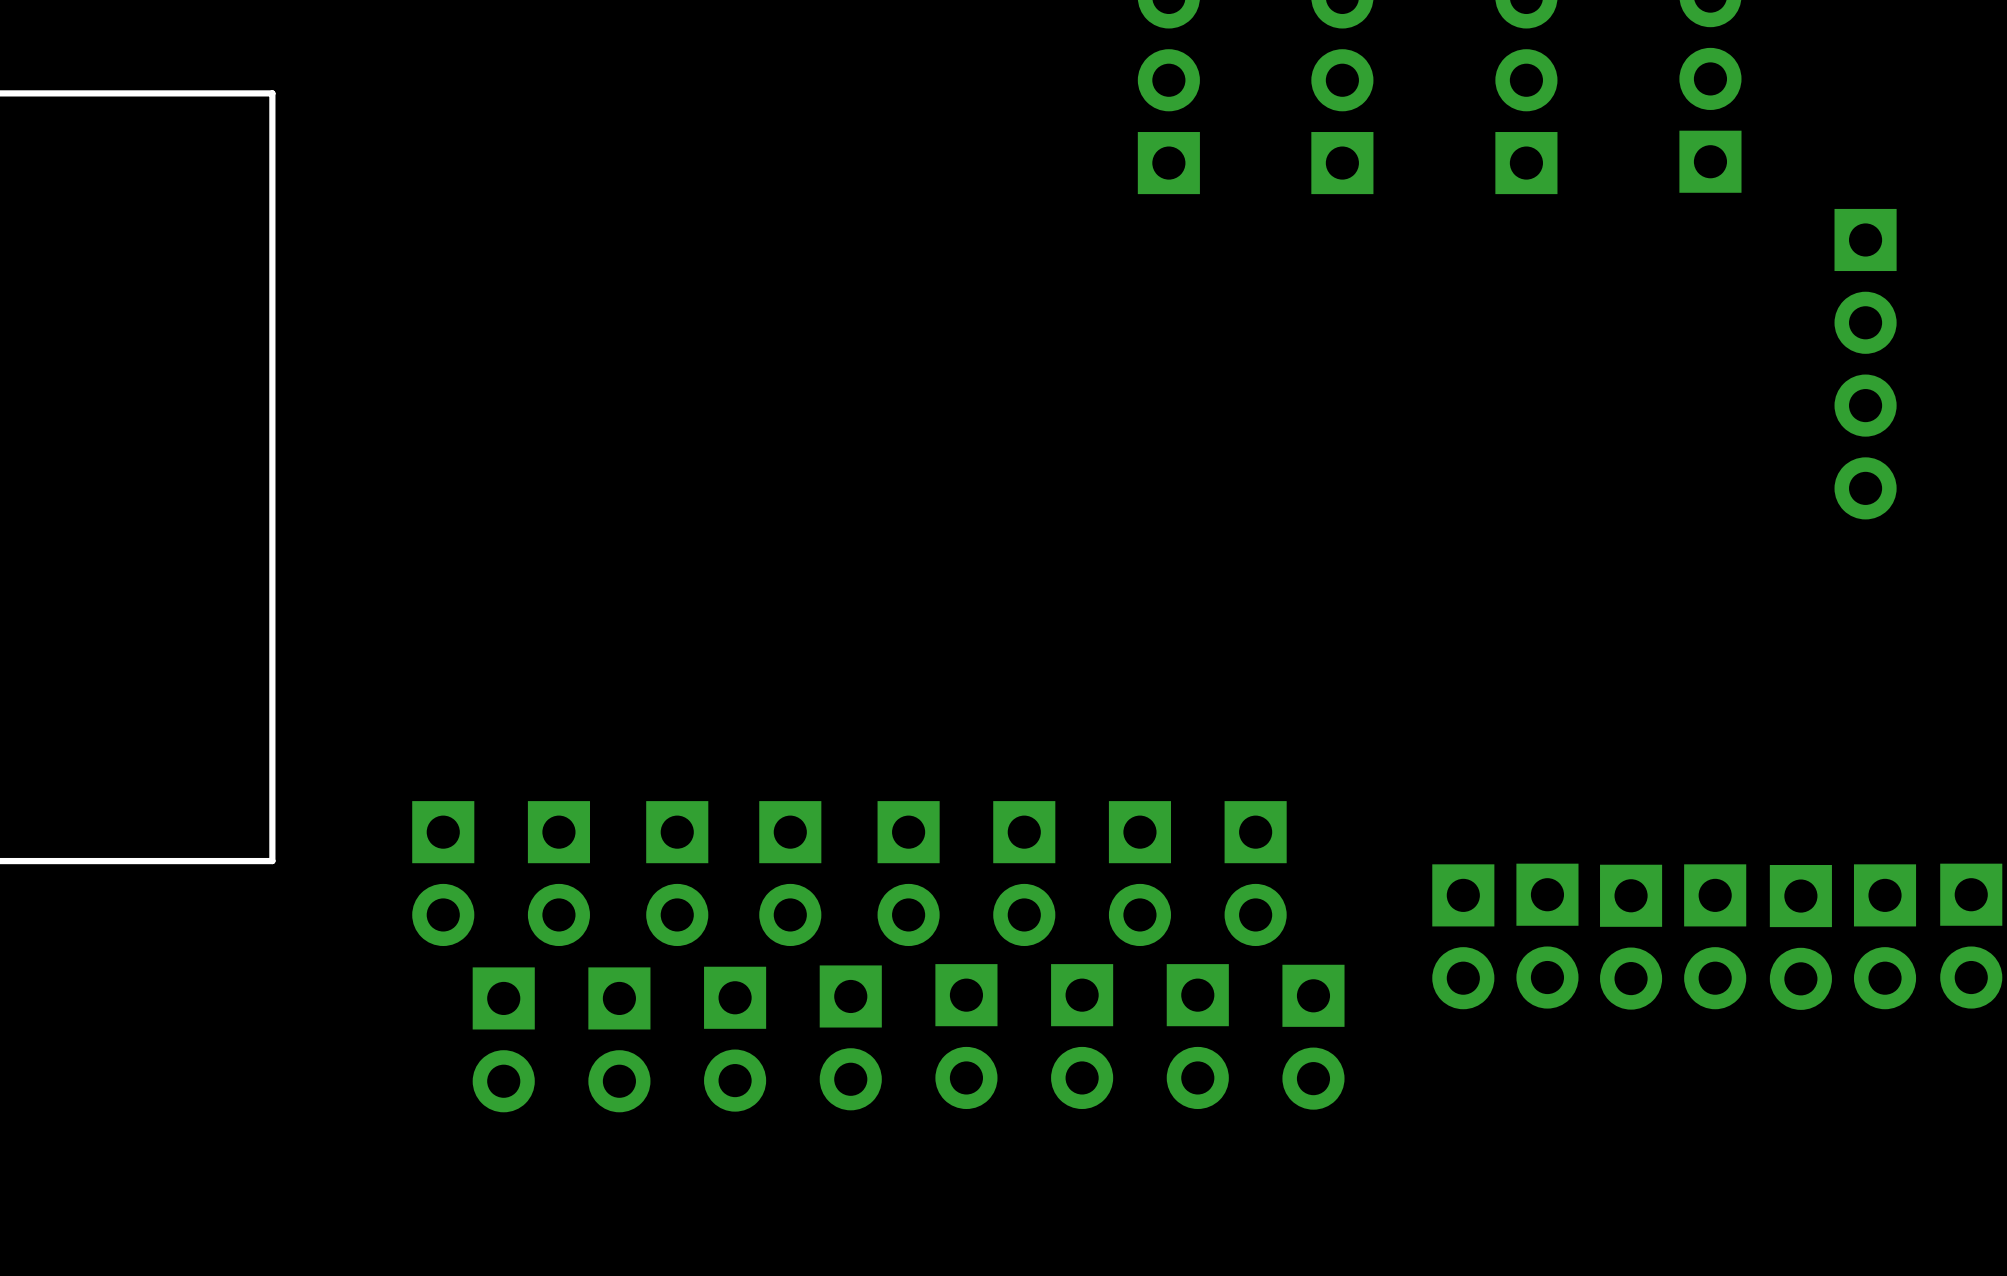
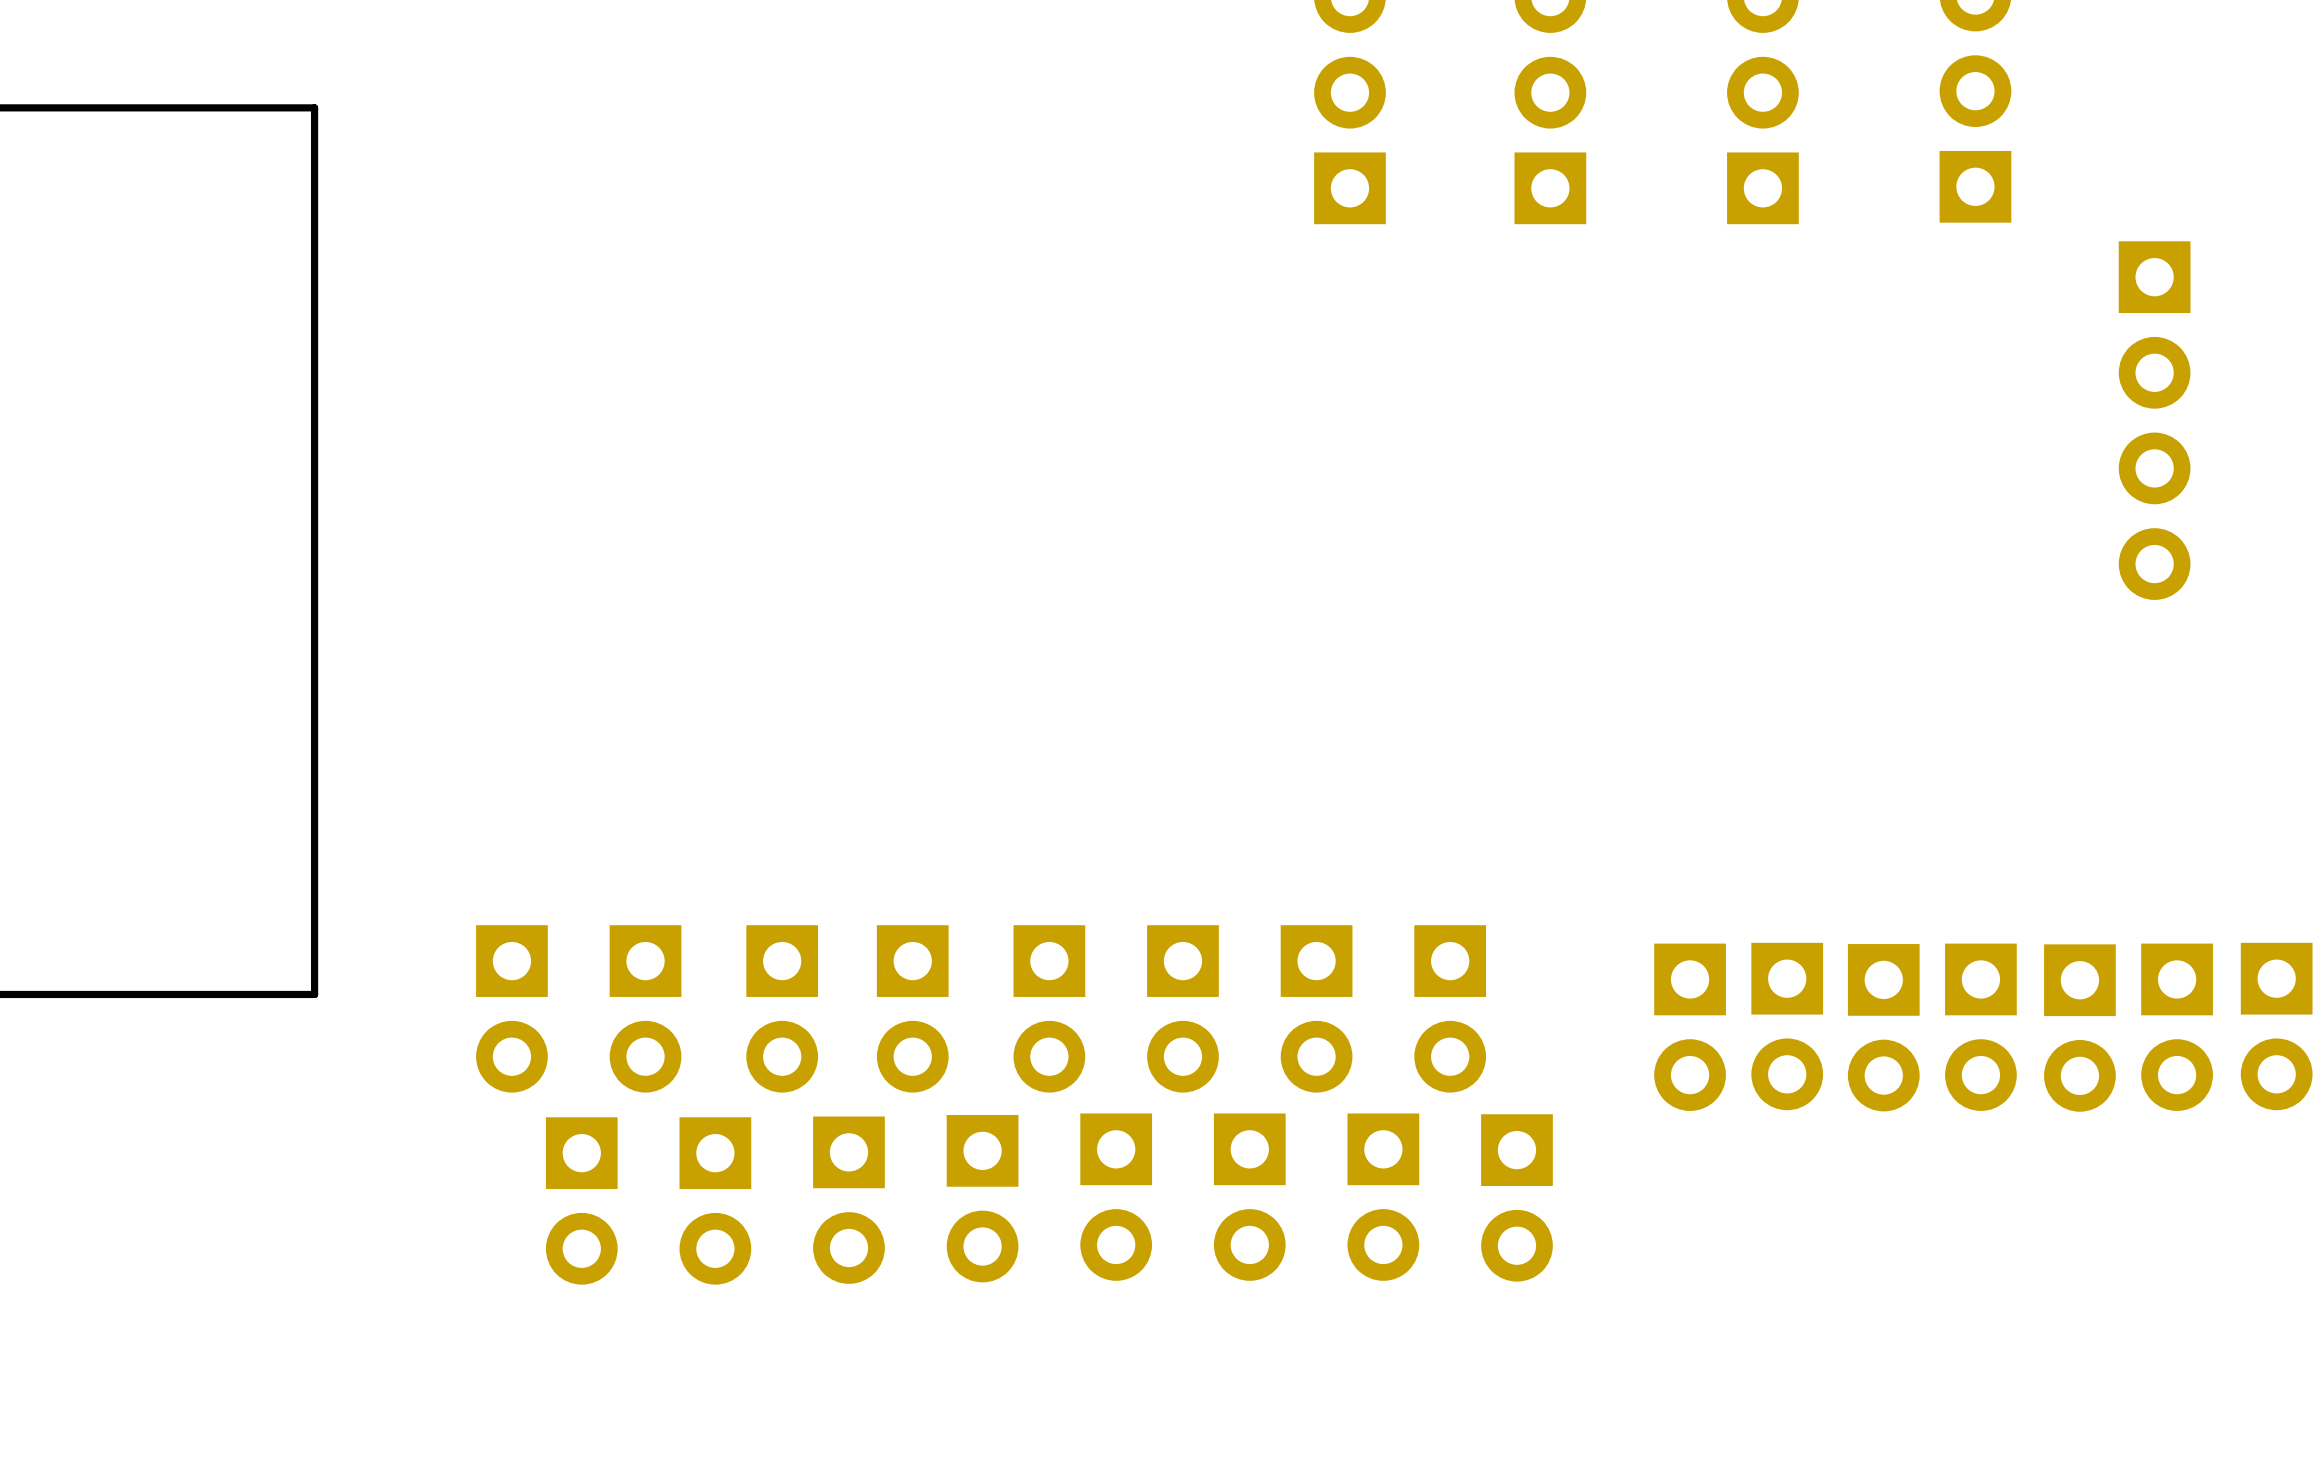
part position: (1463, 936) -> (1690, 1027)
part position: (1547, 936) -> (1787, 1026)
part position: (1715, 936) -> (1980, 1027)
part position: (1885, 936) -> (2177, 1027)
part position: (1971, 936) -> (2276, 1026)
part position: (1631, 937) -> (1883, 1027)
part position: (1800, 937) -> (2079, 1028)

